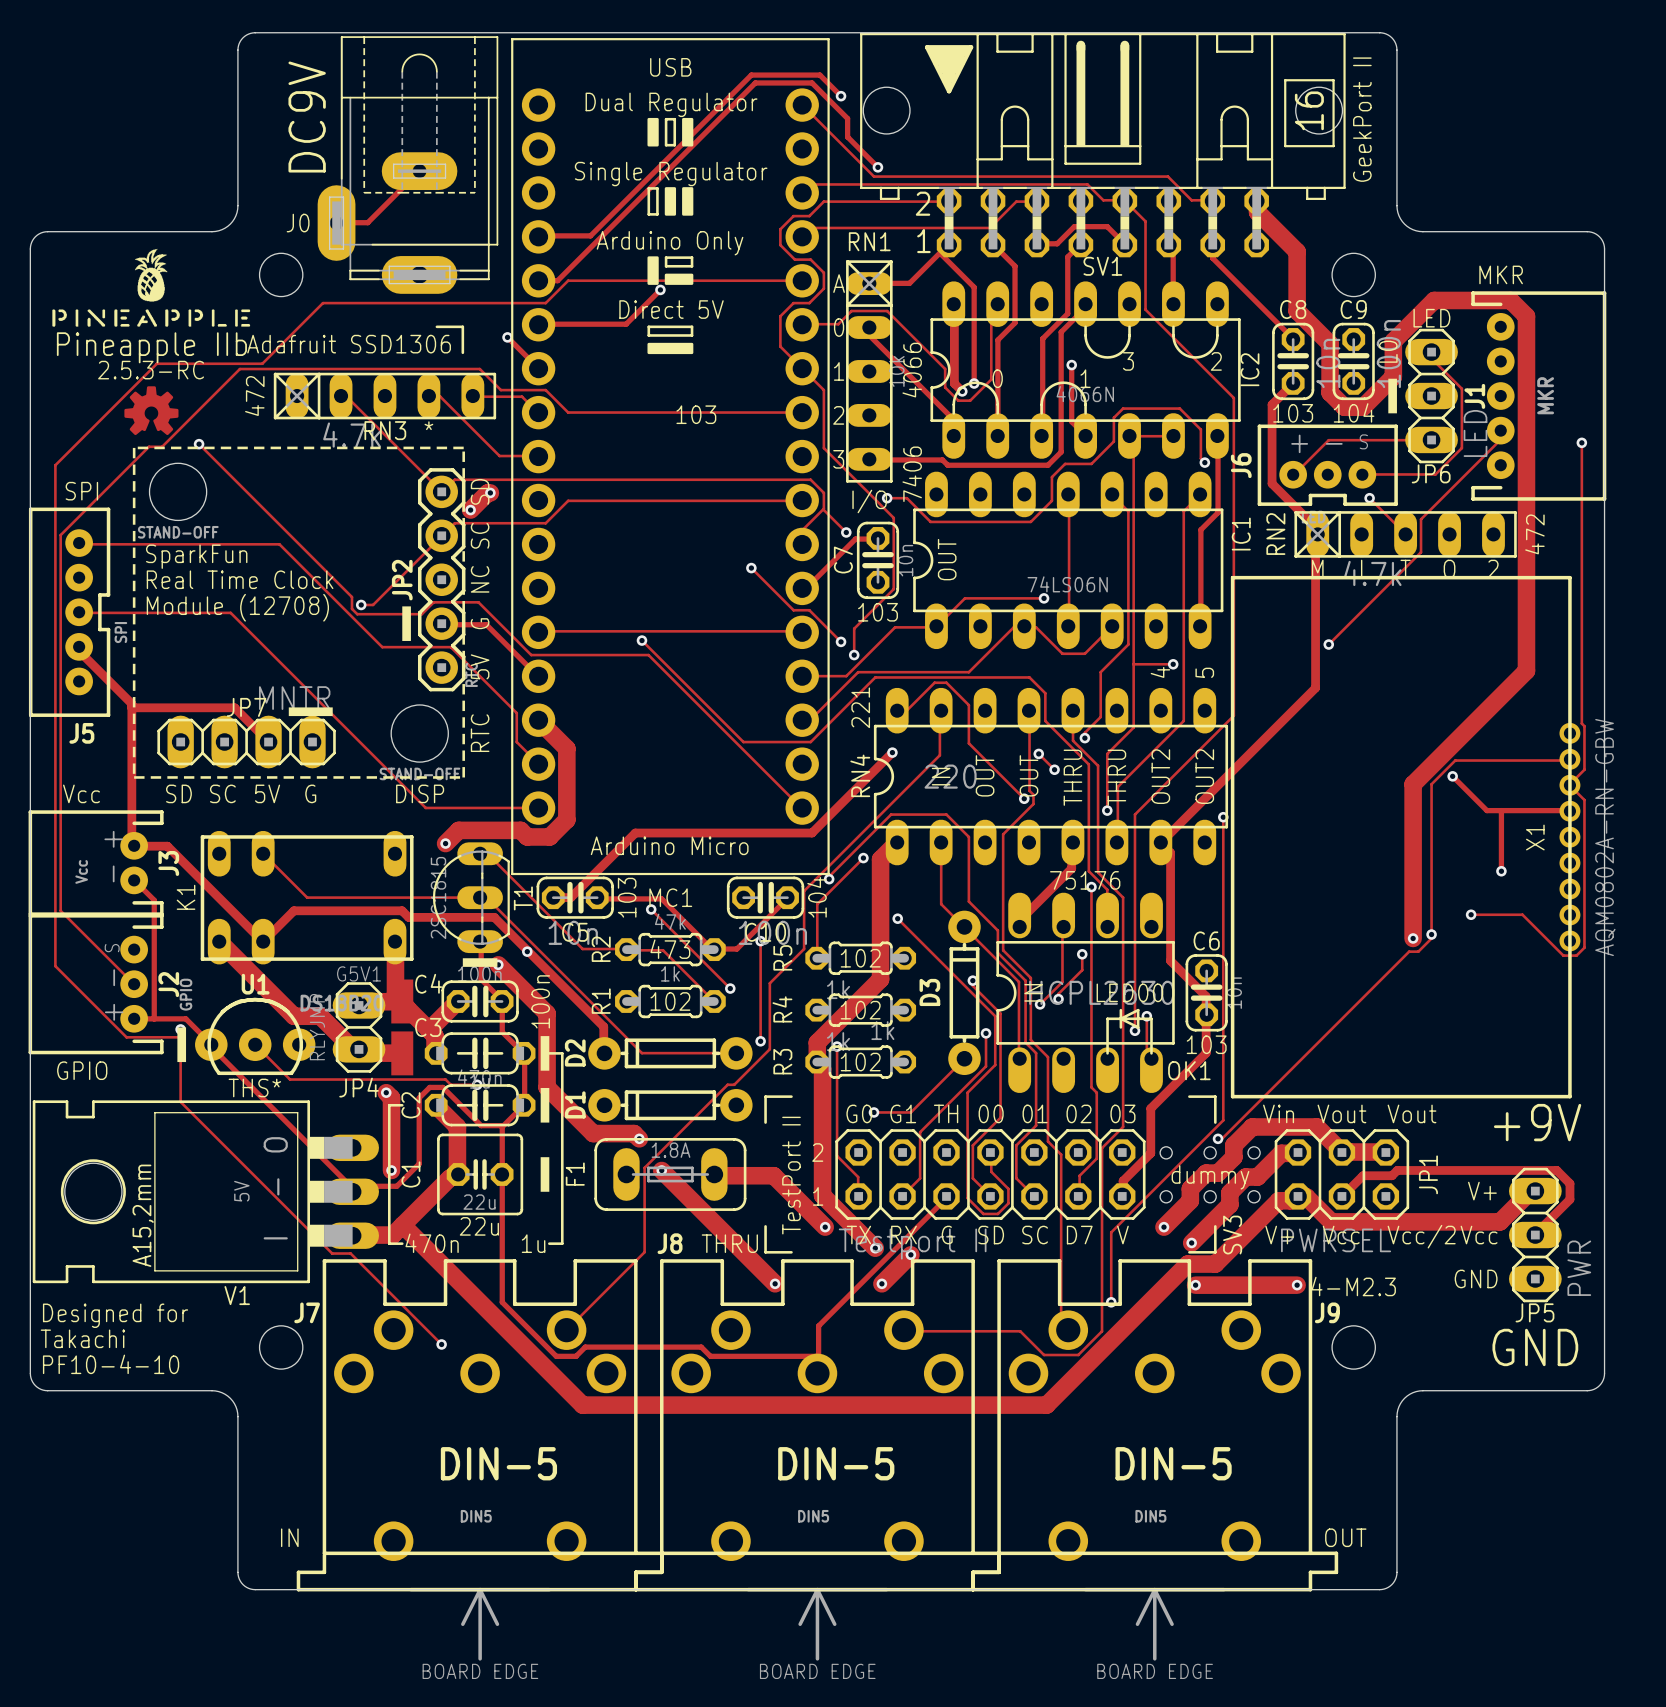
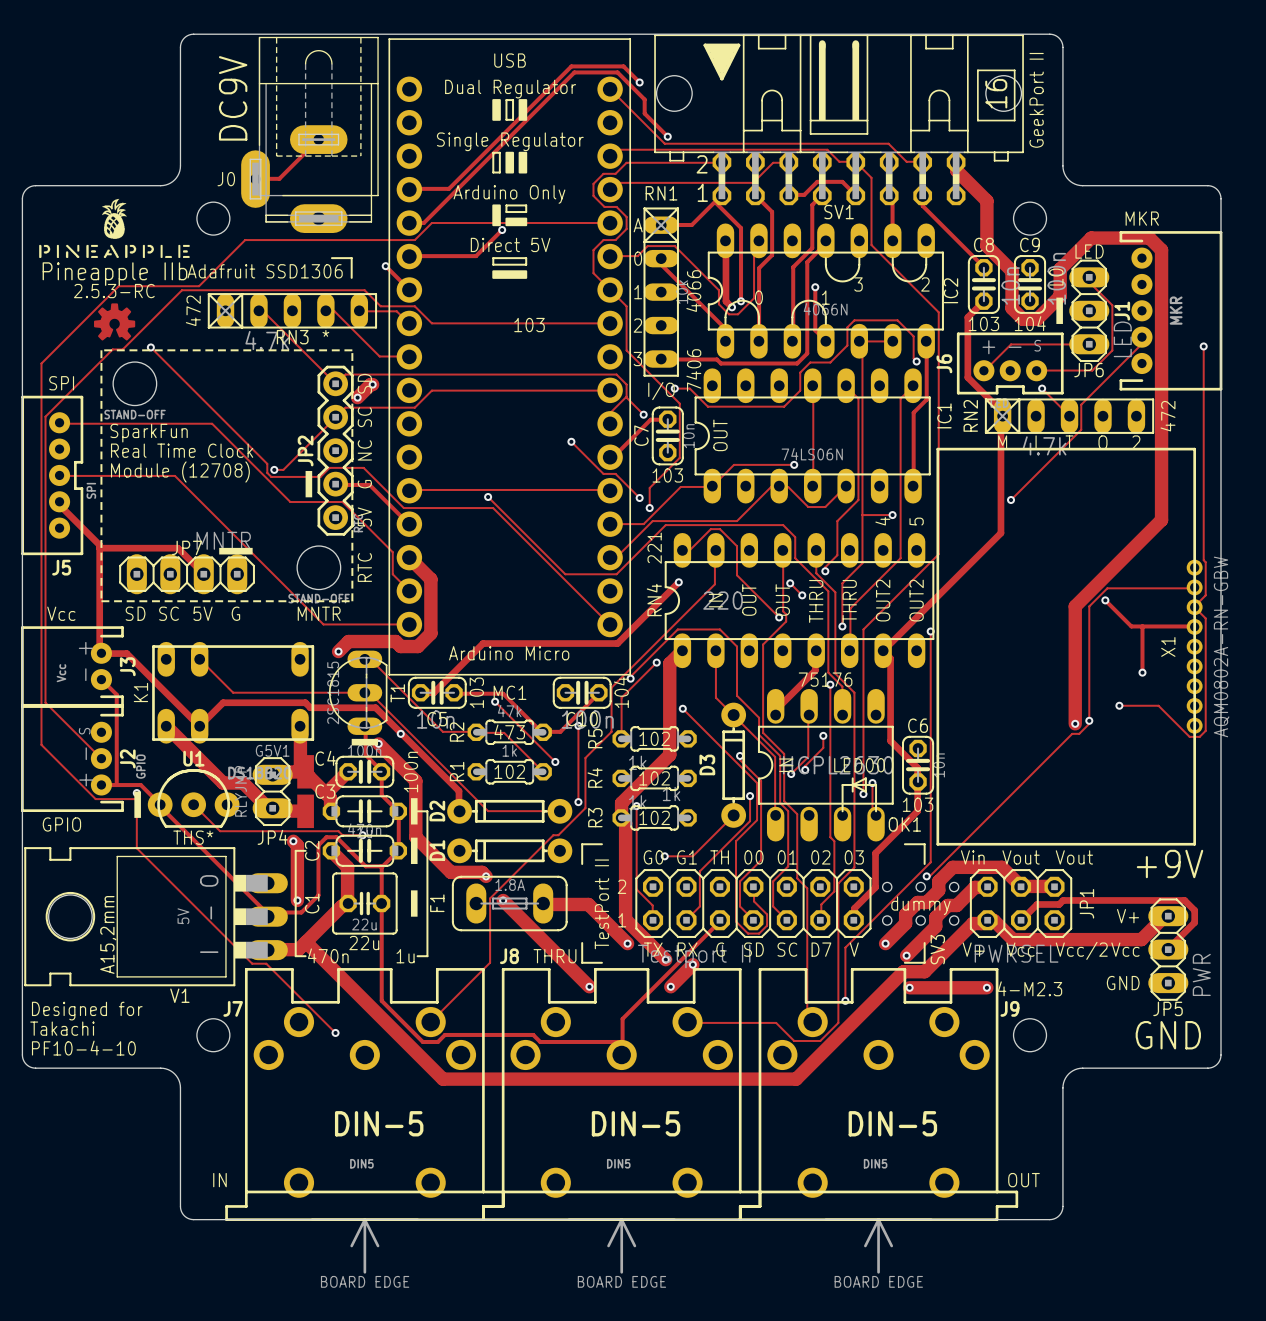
text: DISP (420, 793) -> MNTR (319, 613)

